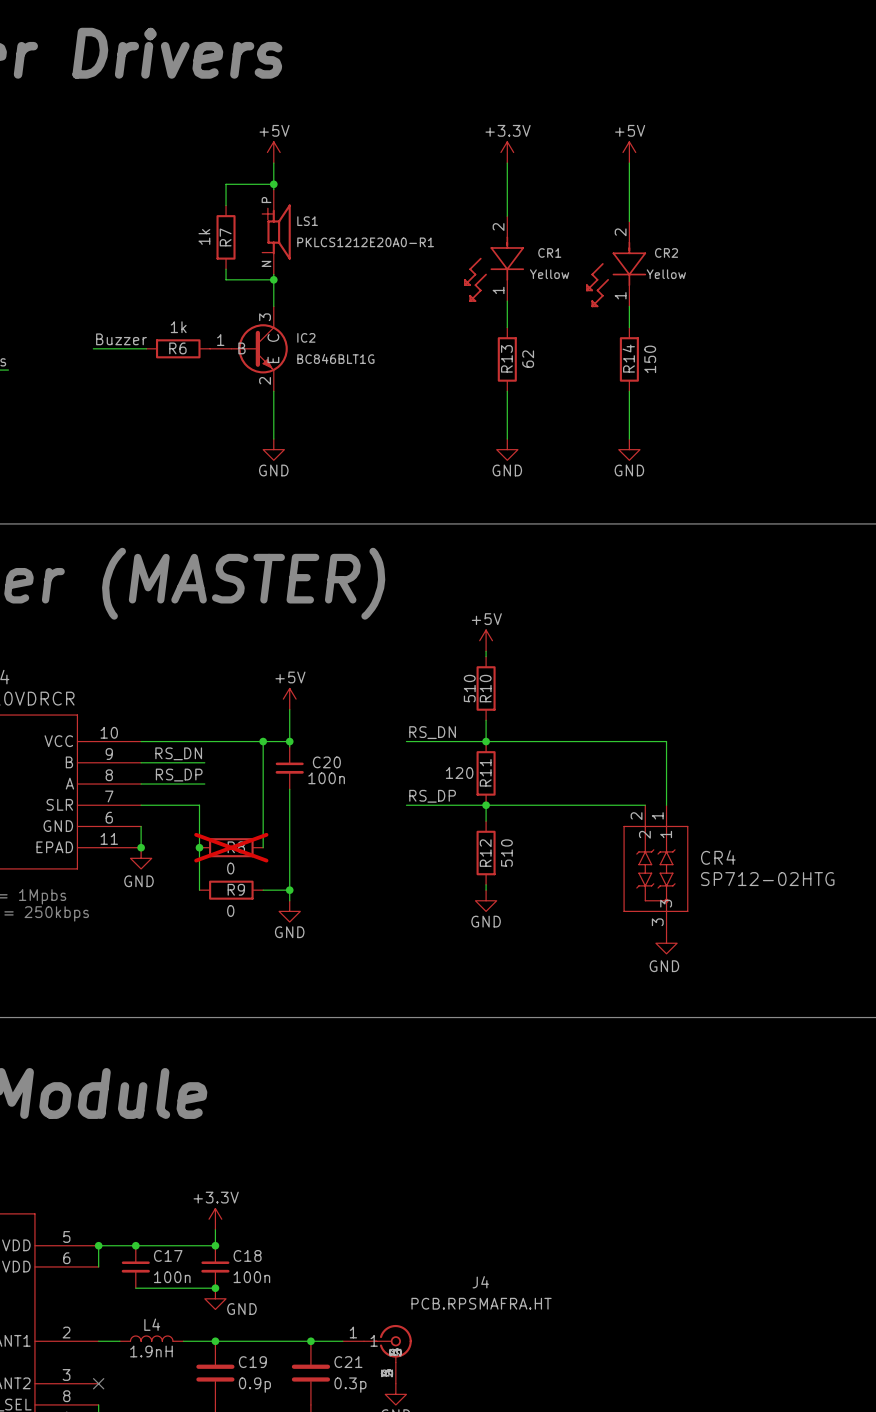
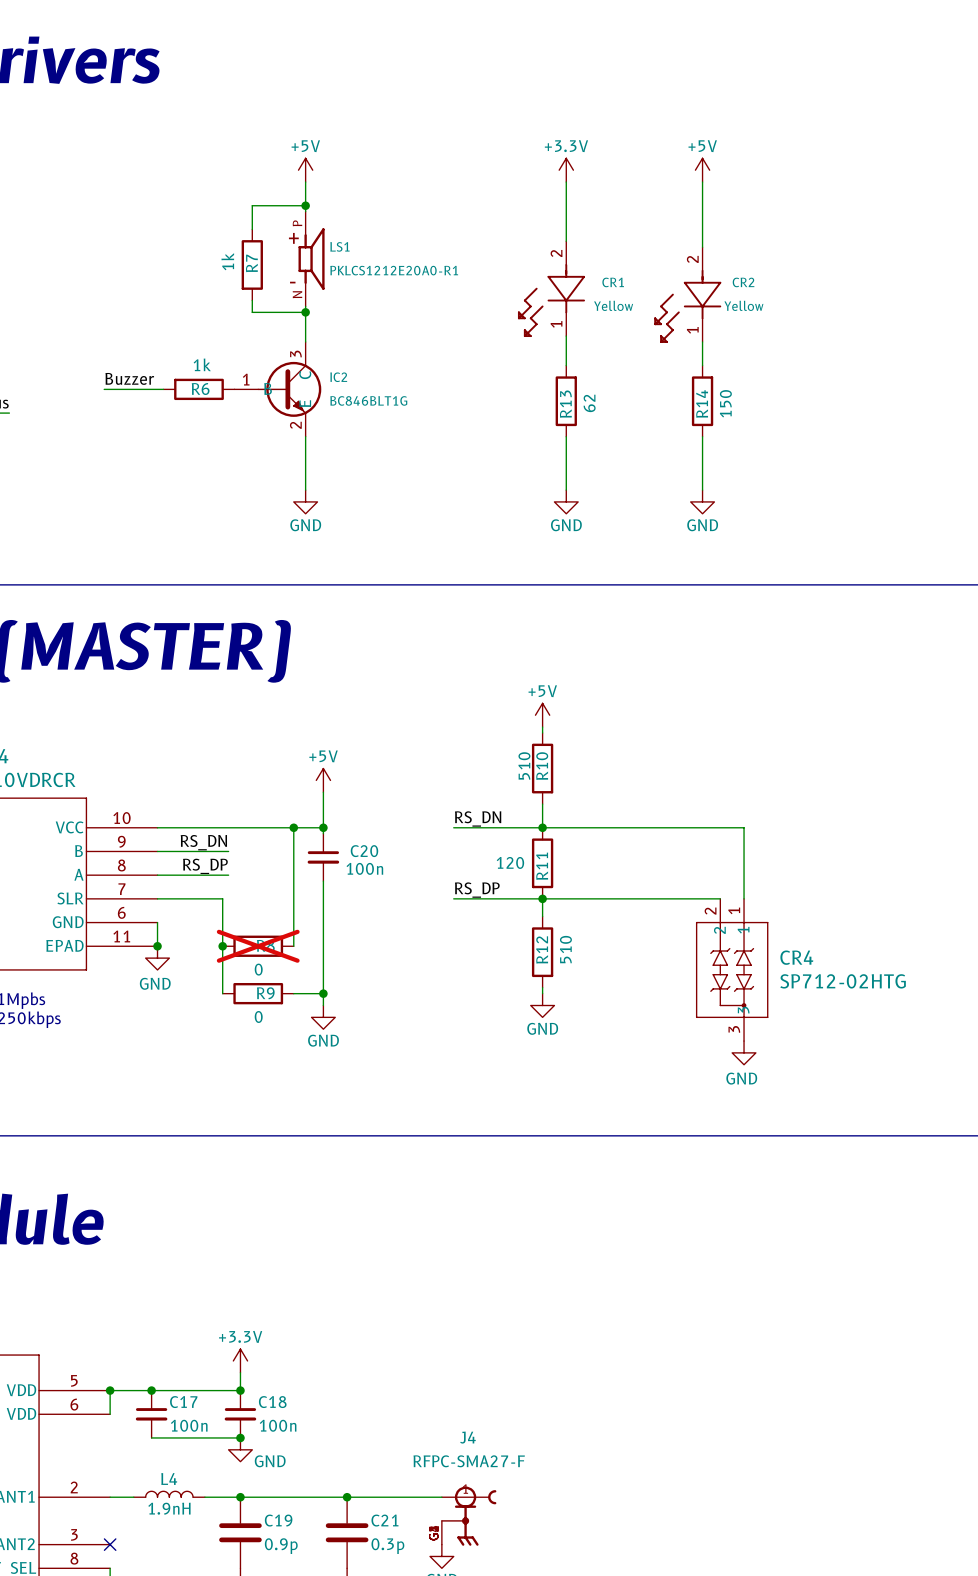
J4 name position: J4 (480, 1282) -> J4 (468, 1437)
J4 value: PCB.RPSMAFRA.HT (481, 1303) -> RFPC-SMA27-F (469, 1461)
J4 symbol: [342, 1324, 412, 1384] -> [441, 1486, 497, 1546]

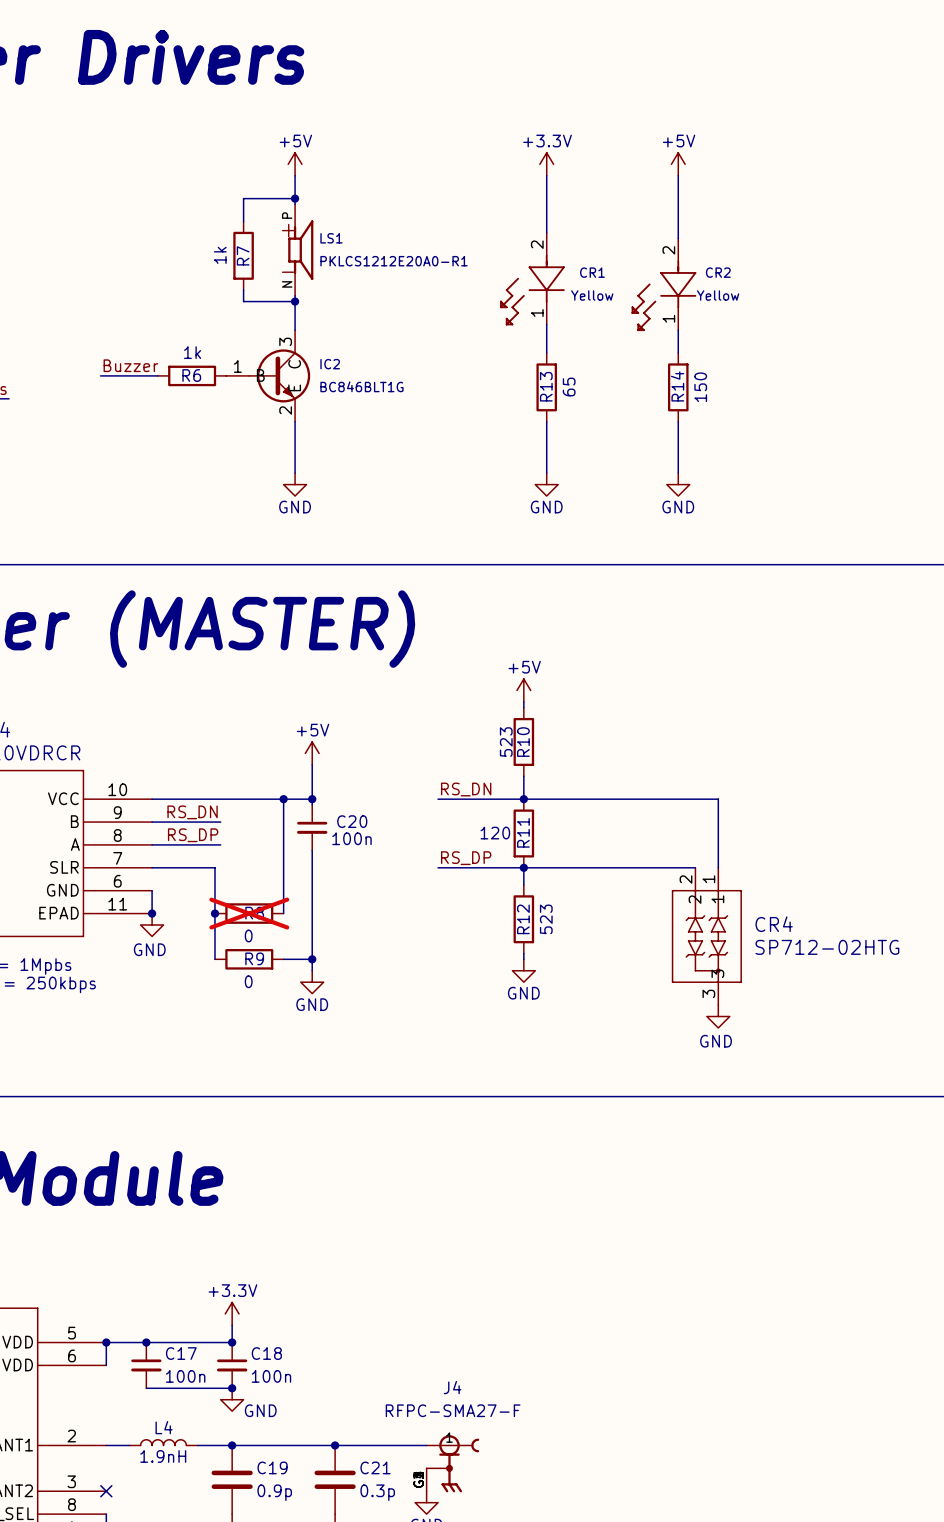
R13 value: 62 (589, 403) -> 65 (569, 387)
R10 value: 510 (524, 765) -> 523 (506, 742)
R12 value: 510 (565, 949) -> 523 (546, 919)

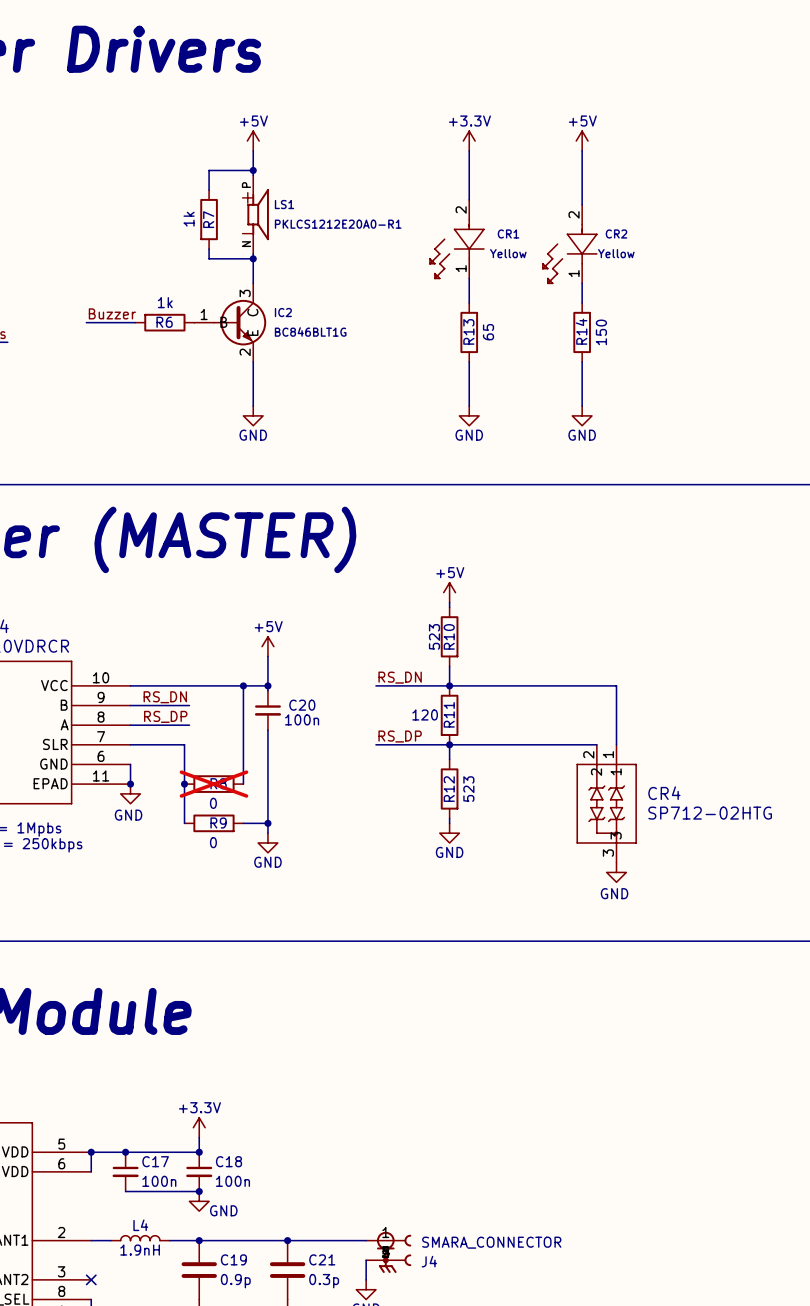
J4 name position: J4 (452, 1387) -> J4 (429, 1261)
J4 value: RFPC-SMA27-F (453, 1410) -> SMARA_CONNECTOR (491, 1242)
J4 symbol: [425, 1435, 480, 1493] -> [366, 1231, 412, 1274]

